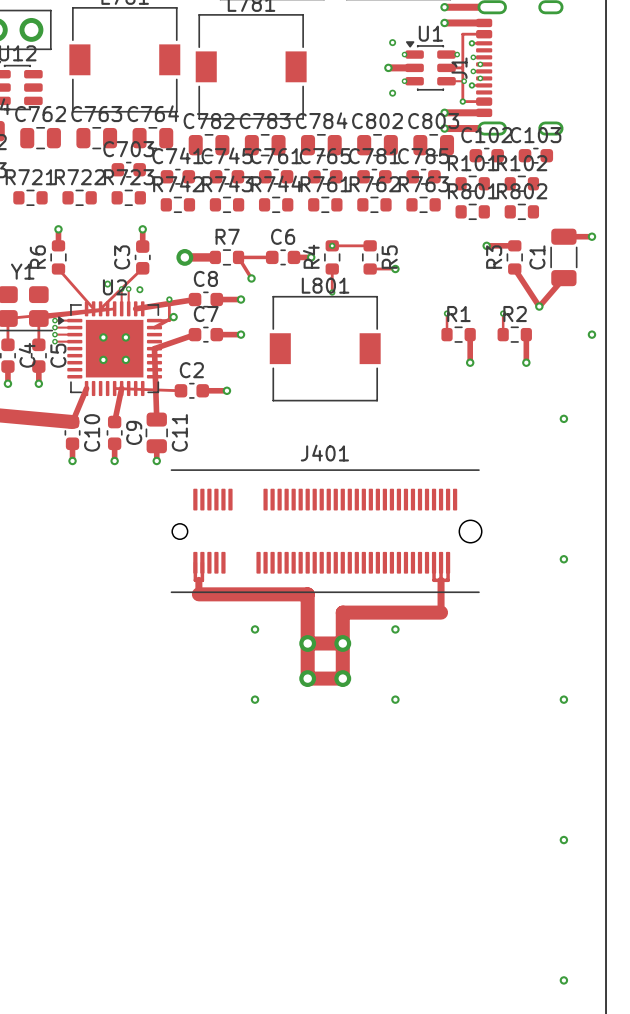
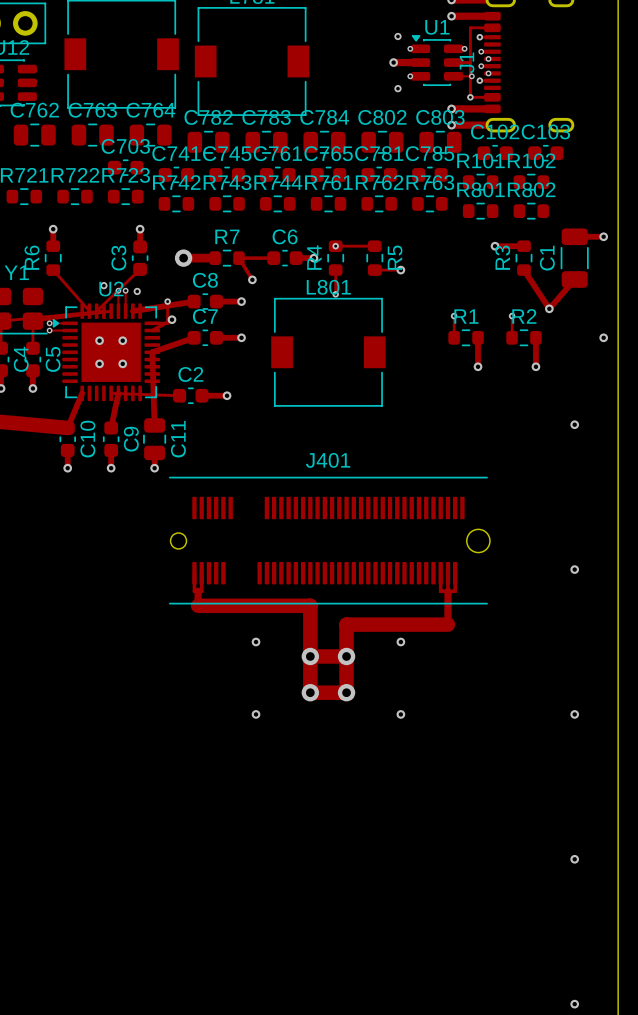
track: (54, 334) (74, 334) -> none
via: (54, 334) -> none
track: (54, 341) (74, 341) -> none
via: (54, 341) -> none

